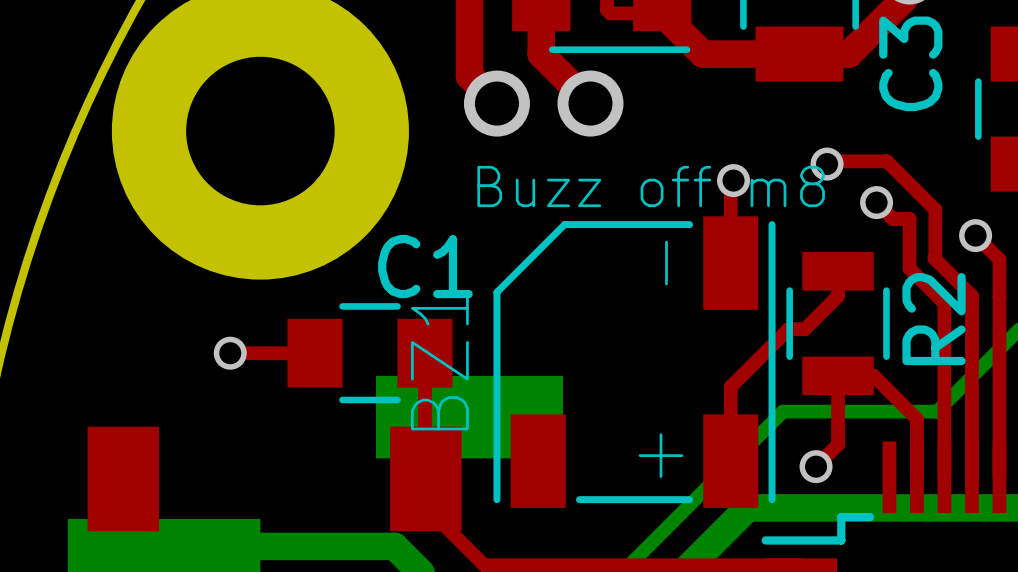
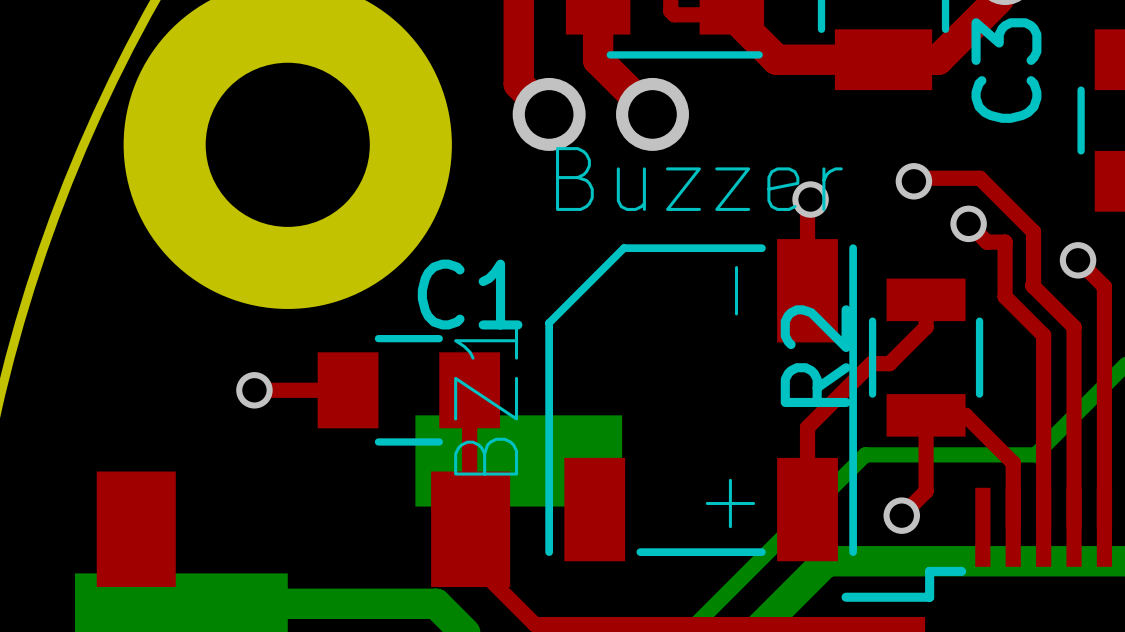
BZ1 value: Buzz off m8 (651, 186) -> Buzzer (699, 179)
R2 name position: R2 (934, 319) -> R2 (815, 356)

